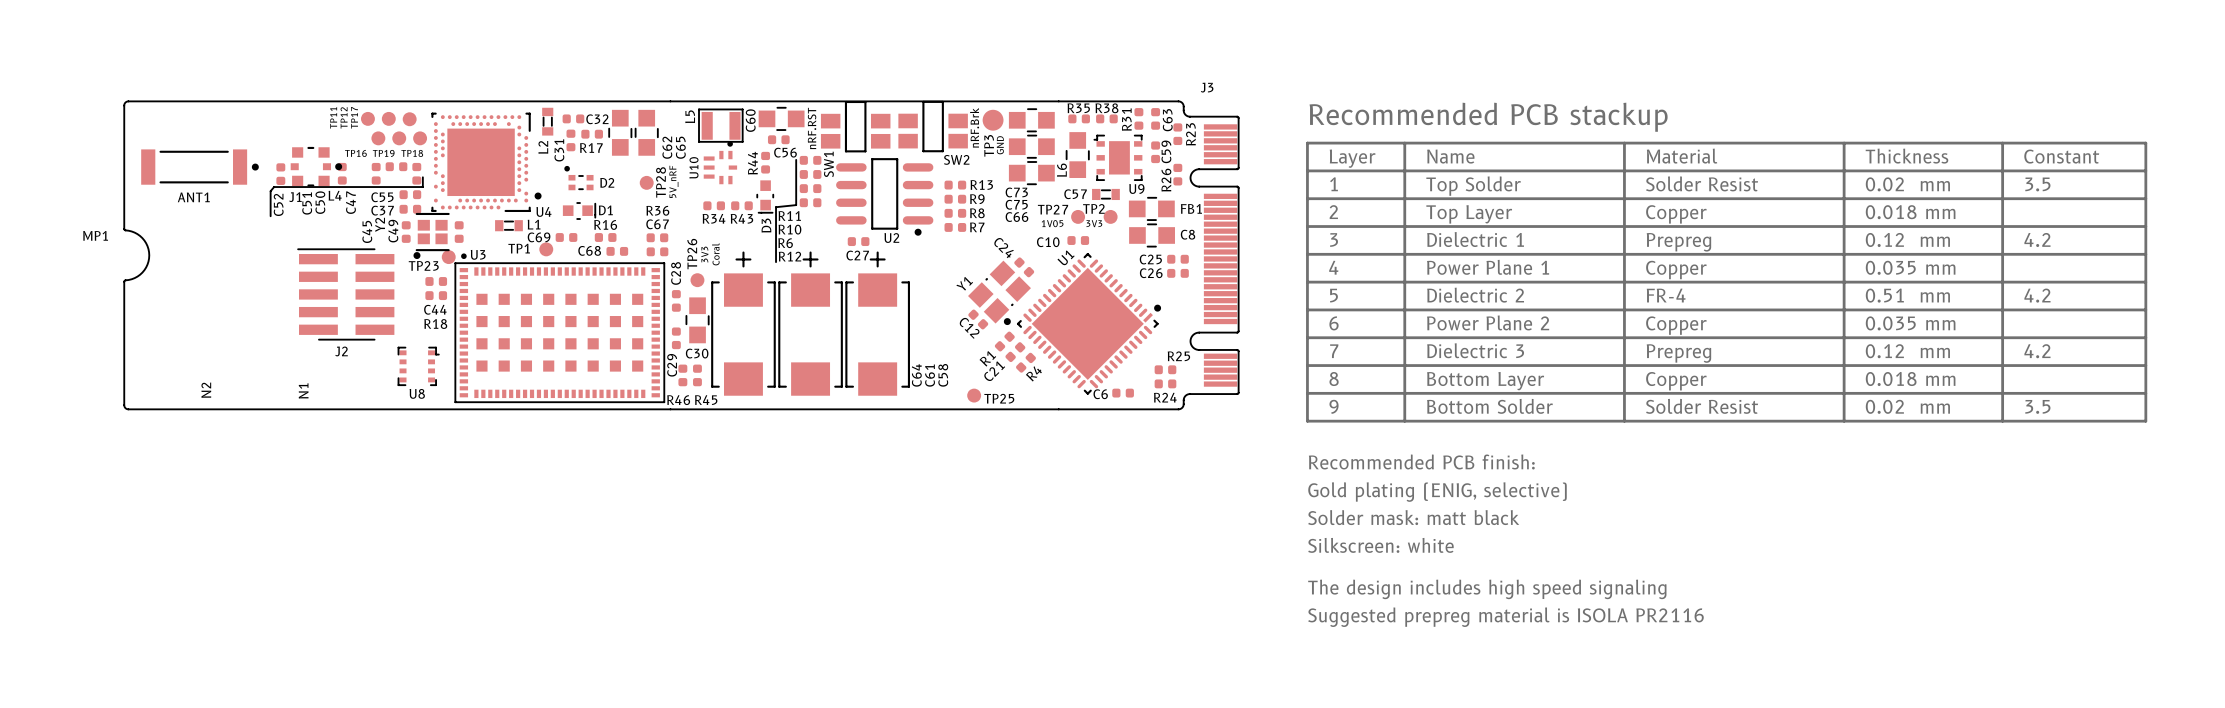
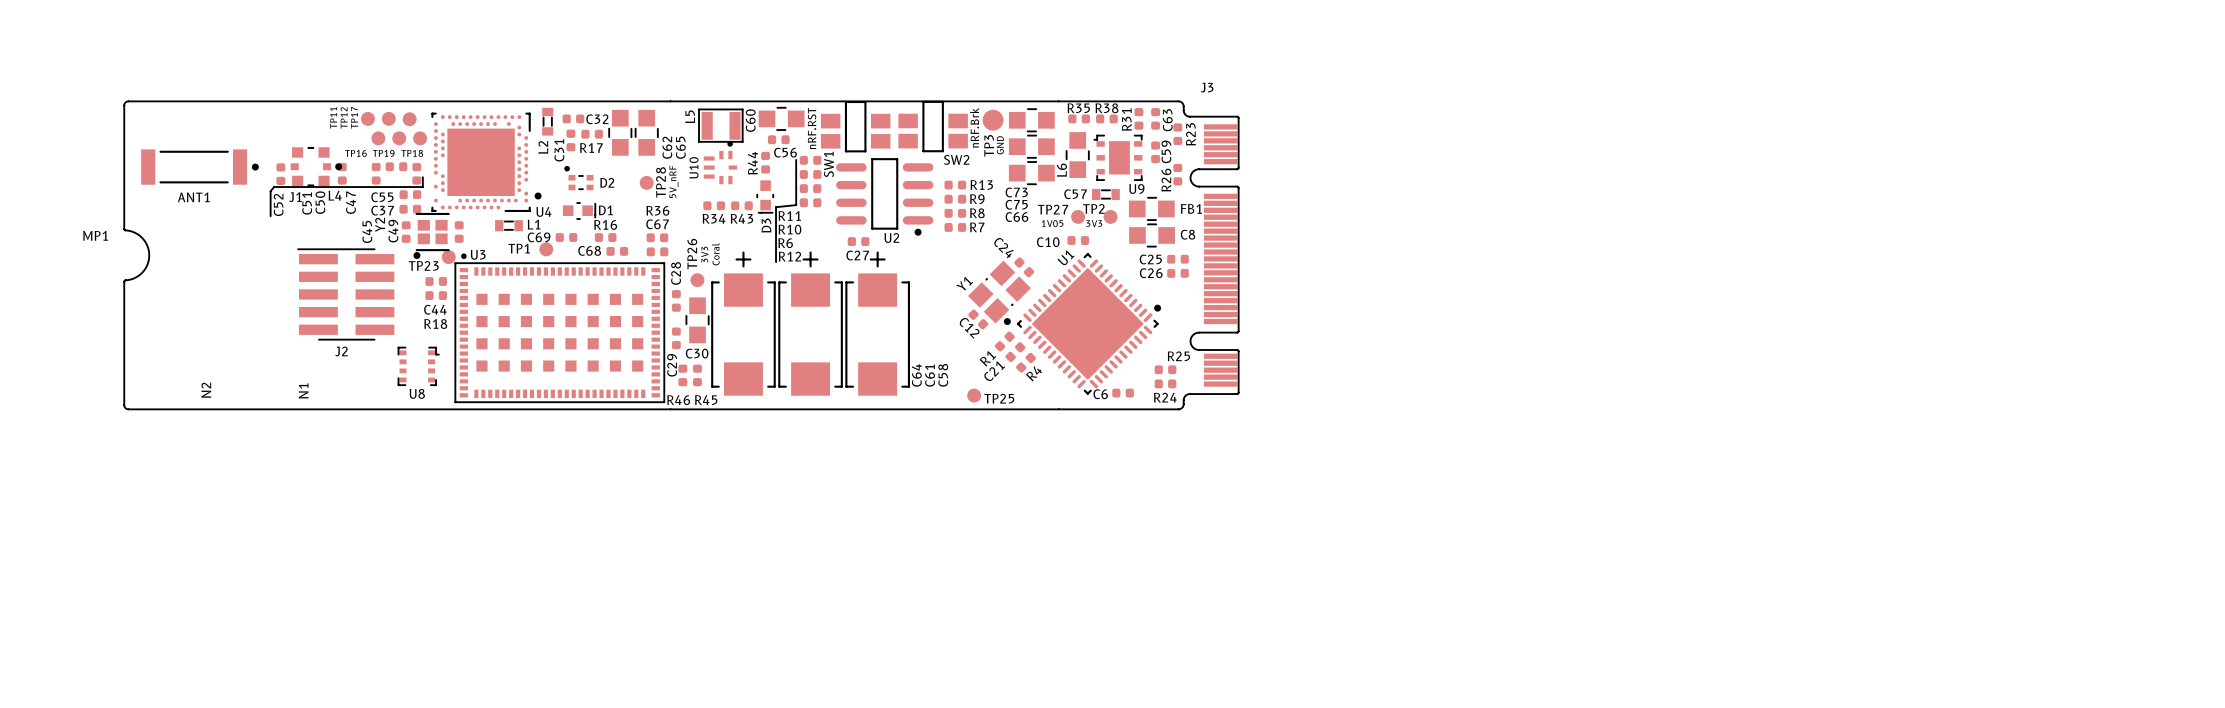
text: Recommended PCB stackup (1488, 117) -> none
line: (1307, 143) (2145, 143) (2145, 421) (1307, 421) (1307, 143) -> none
line: (1404, 143) (1404, 421) -> none
line: (1624, 143) (1624, 421) -> none
line: (1844, 143) (1844, 421) -> none
line: (2002, 143) (2002, 421) -> none
text: Name (1450, 156) -> none
text: Material (1682, 156) -> none
text: Thickness (1906, 156) -> none
text: Constant (2061, 156) -> none
text: Layer (1352, 158) -> none
line: (1307, 170) (2145, 170) -> none
text: Solder Resist (1702, 183) -> none
text: 1 (1334, 184) -> none
text: 0.02 mm (1907, 184) -> none
text: 3.5 (2037, 184) -> none
text: Top Solder (1473, 186) -> none
line: (1307, 198) (2145, 198) -> none
text: 2 (1333, 212) -> none
text: 0.018 mm (1910, 212) -> none
text: Top Layer (1469, 214) -> none
text: Copper (1676, 214) -> none
line: (1307, 226) (2145, 226) -> none
text: 3 (1334, 239) -> none
text: Dielectric 1 (1475, 239) -> none
text: 0.12 mm (1907, 239) -> none
text: 4.2 (2037, 239) -> none
text: Prepreg (1678, 242) -> none
line: (1307, 254) (2145, 254) -> none
text: 4 (1333, 267) -> none
text: Power Plane 1 (1488, 267) -> none
text: 0.035 mm (1910, 267) -> none
text: Copper (1676, 270) -> none
line: (1307, 282) (2145, 282) -> none
text: 5 (1334, 295) -> none
text: Dielectric 2 (1475, 295) -> none
text: FR-4 (1666, 295) -> none
text: 0.51 mm (1907, 295) -> none
text: 4.2 (2037, 295) -> none
line: (1307, 309) (2145, 309) -> none
text: Power Plane 2 (1488, 322) -> none
text: 6 (1334, 323) -> none
text: 0.035 mm (1910, 323) -> none
text: Copper (1676, 325) -> none
line: (1307, 337) (2145, 337) -> none
text: Dielectric 3 (1475, 350) -> none
text: 7 (1334, 351) -> none
text: 0.12 mm (1907, 351) -> none
text: 4.2 (2037, 351) -> none
text: Prepreg (1678, 353) -> none
line: (1307, 365) (2145, 365) -> none
text: 8 (1334, 379) -> none
text: 0.018 mm (1910, 379) -> none
text: Bottom Layer (1485, 381) -> none
text: Copper (1676, 381) -> none
line: (1307, 393) (2145, 393) -> none
text: 9 (1334, 406) -> none
text: Bottom Solder (1489, 406) -> none
text: Solder Resist (1702, 406) -> none
text: 0.02 mm (1907, 406) -> none
text: 3.5 (2037, 406) -> none
text: Recommended PCB finish: (1421, 461) -> none
text: Gold plating (ENIG, selective) (1437, 492) -> none
text: Solder mask: matt black (1413, 517) -> none
text: Silkscreen: white (1380, 545) -> none
text: The design includes high speed signaling (1487, 589) -> none
text: Suggested prepreg material is ISOLA PR2116 (1505, 617) -> none

